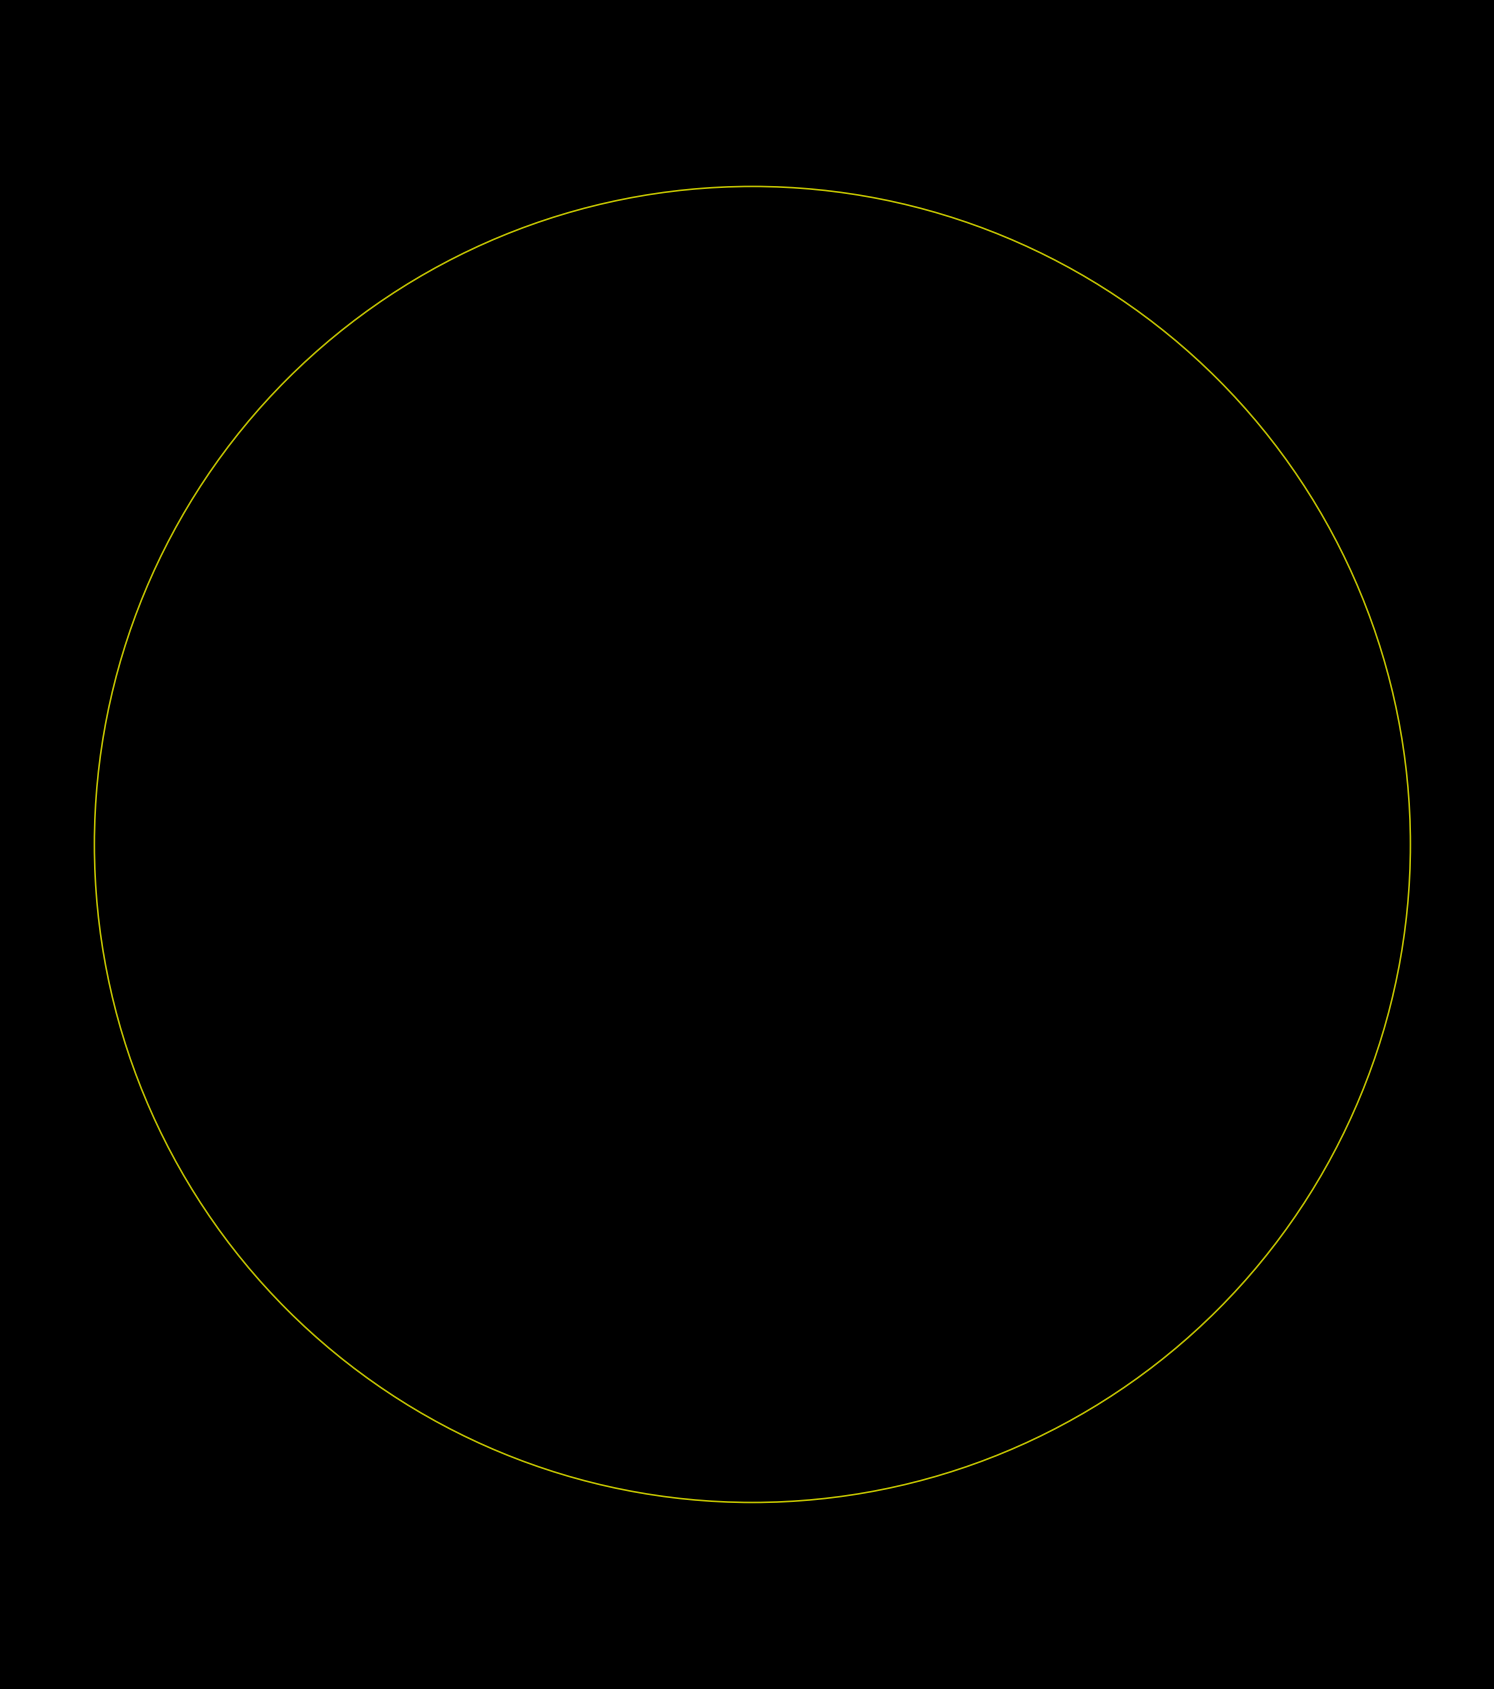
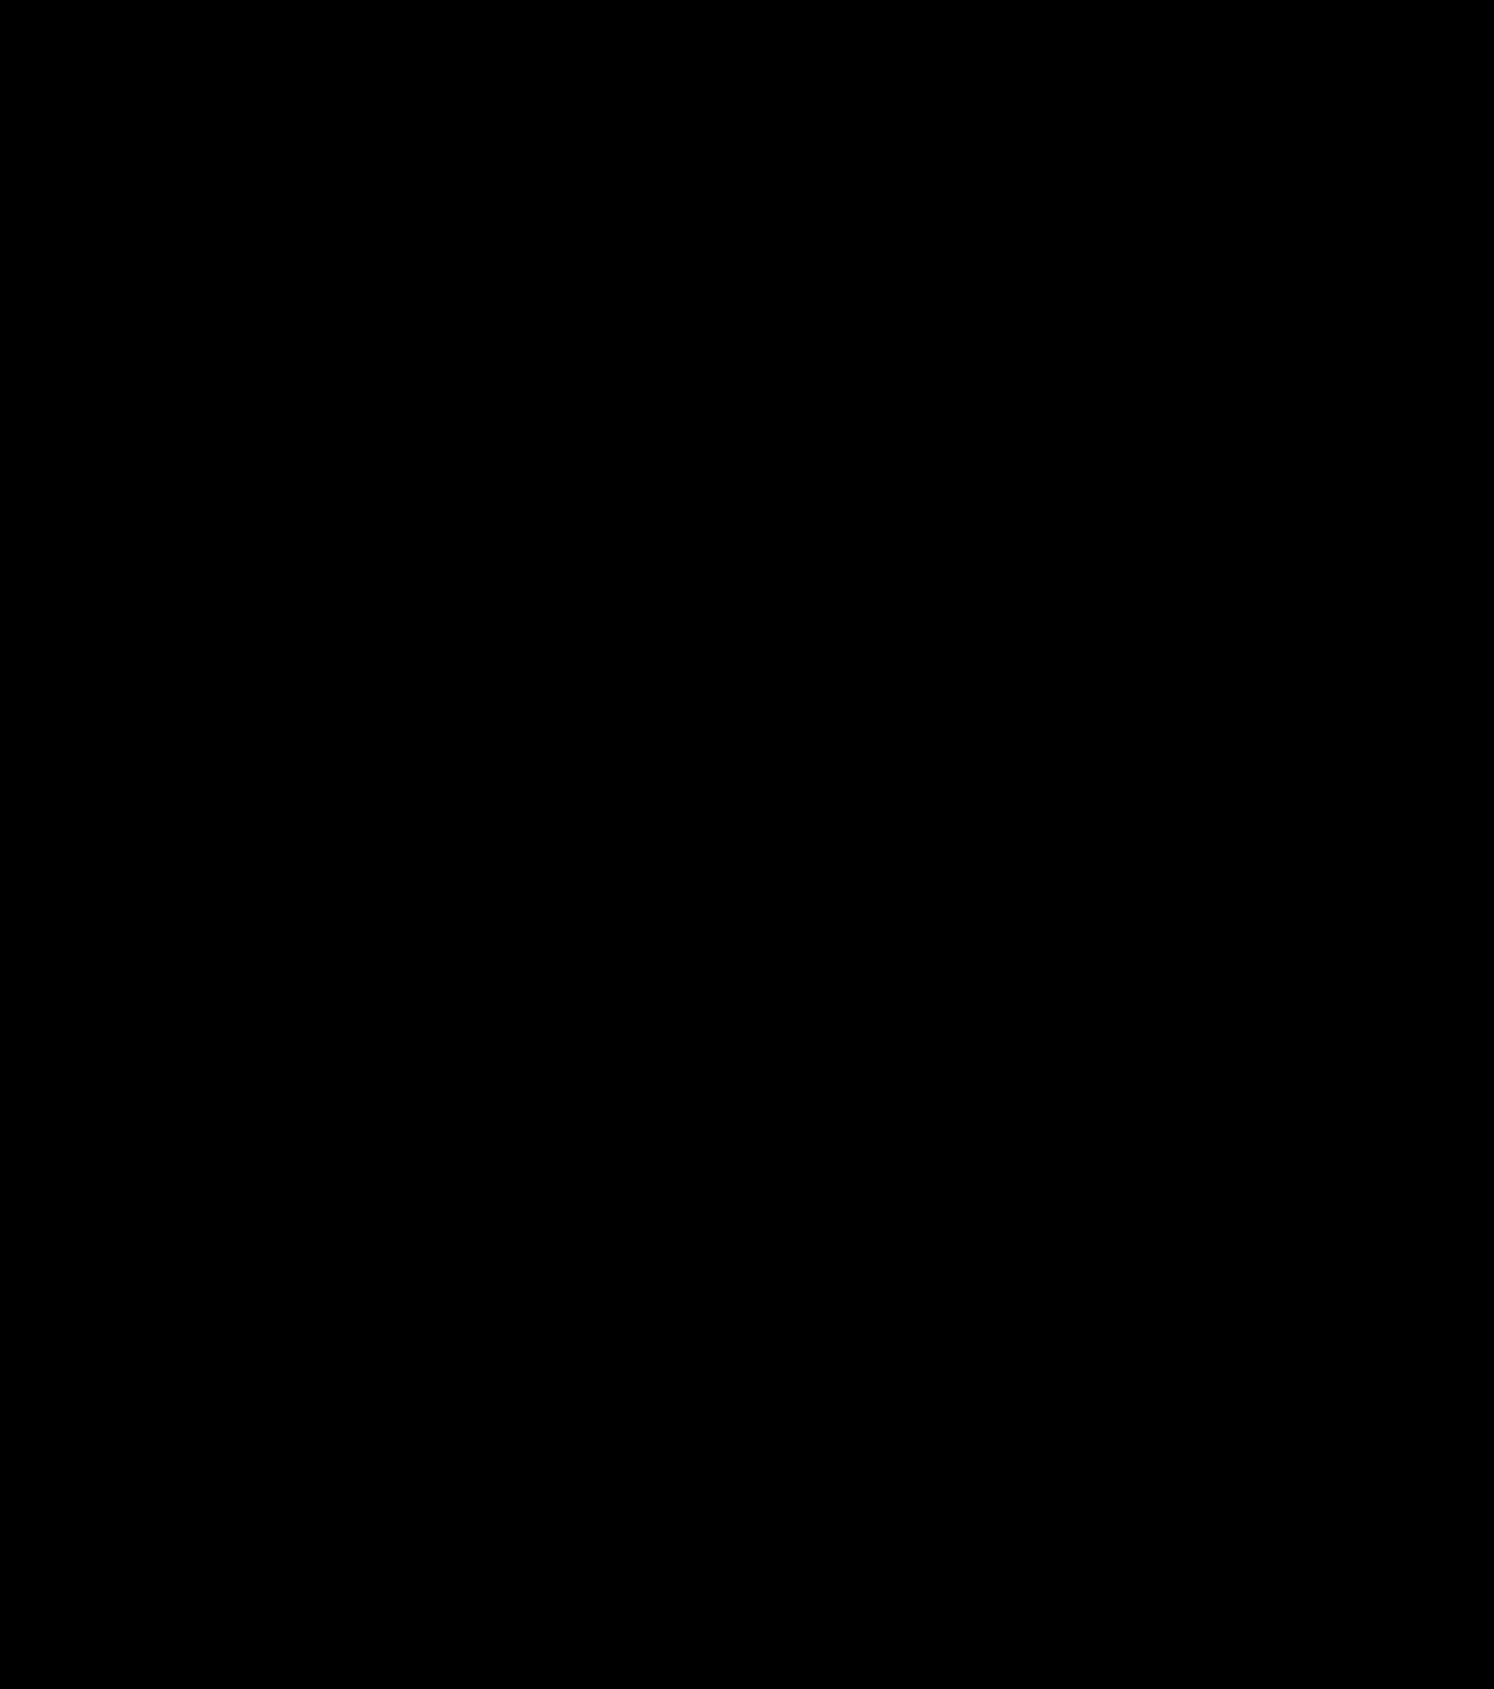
round board edge: [93, 185, 1412, 1504] -> none

